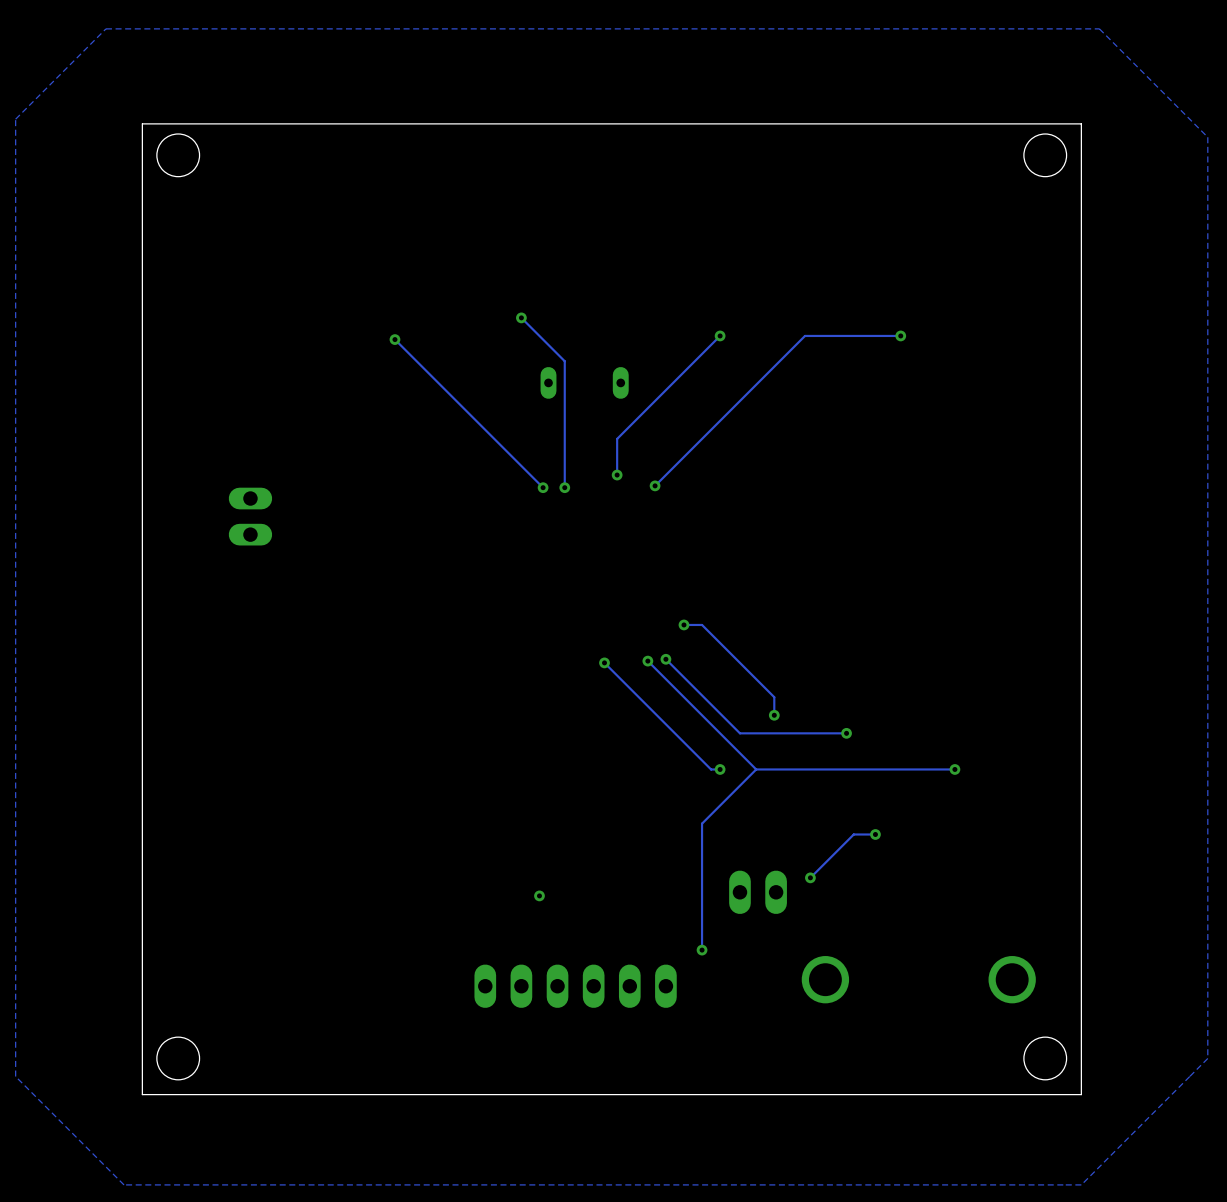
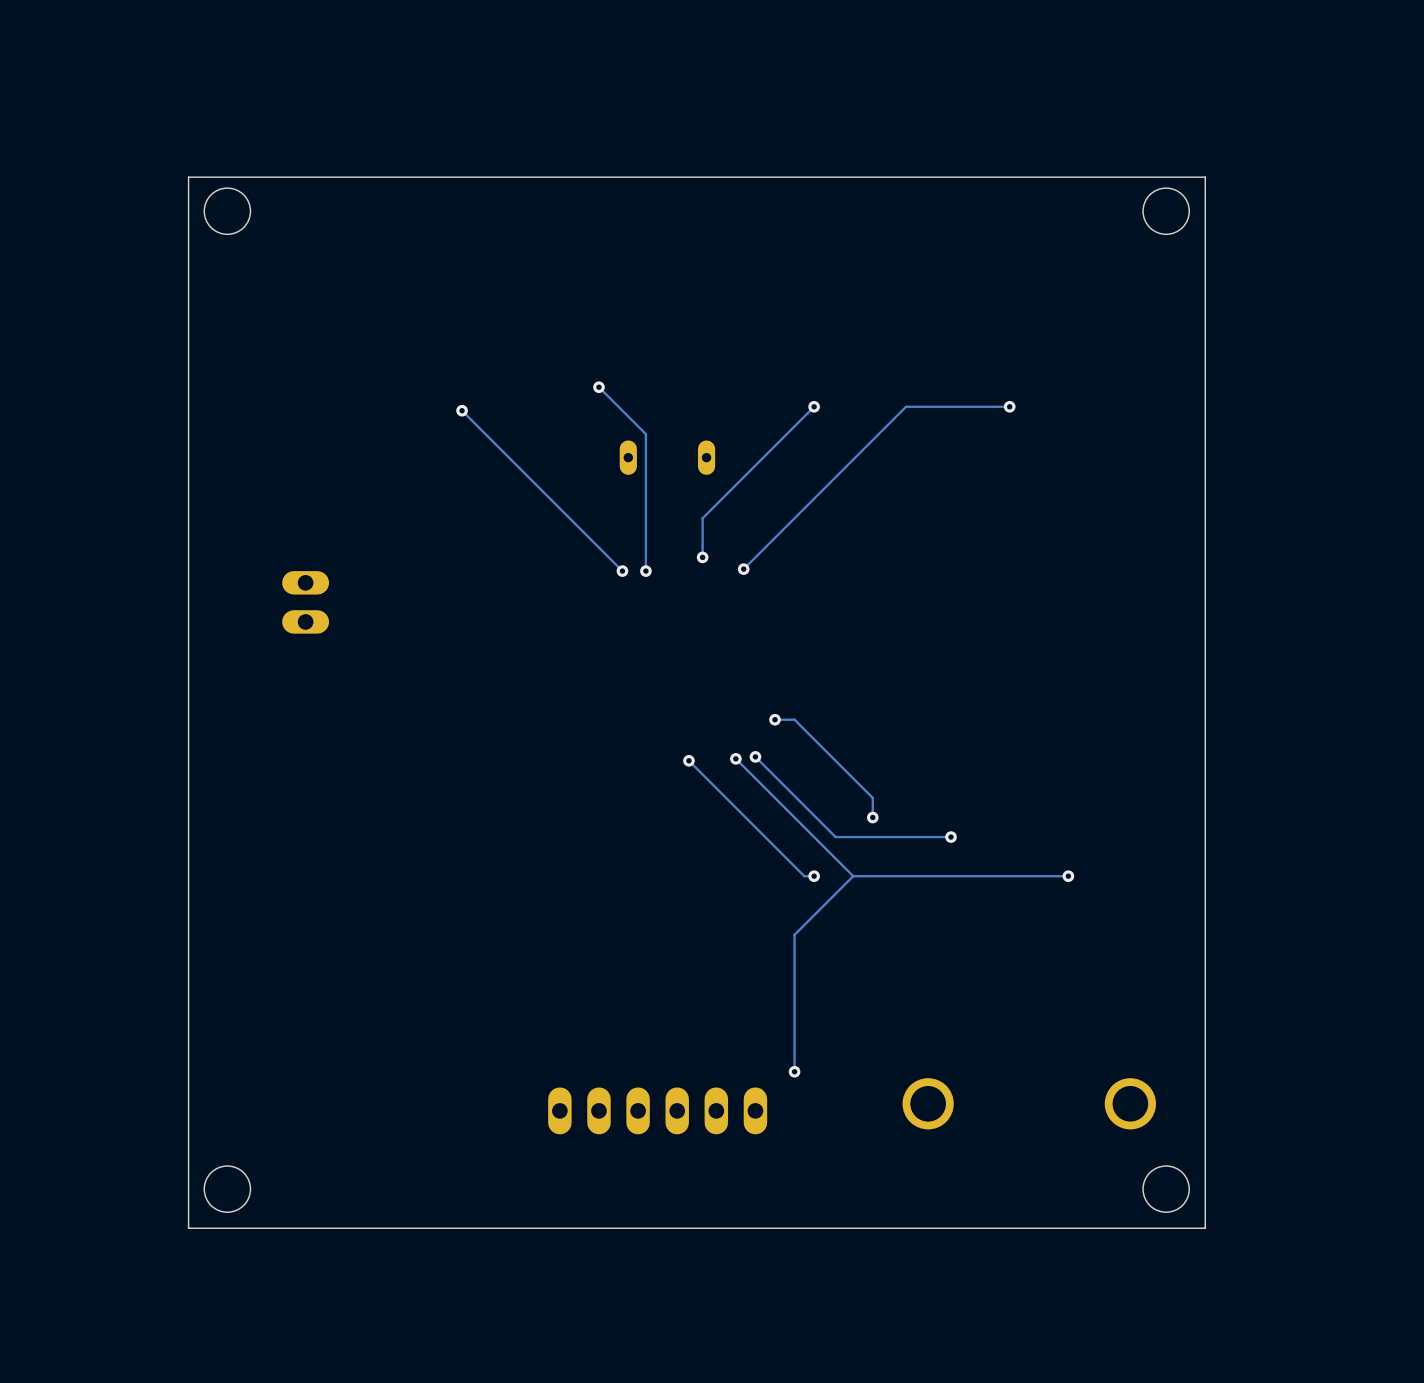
zone outline: (1099, 28) (105, 28) (15, 119) (15, 1076) (124, 1184) (1081, 1184) (1207, 1058) (1207, 137) (1099, 28) -> none
track: (875, 834) (853, 834) (810, 877) -> none
via: (875, 834) -> none
via: (810, 877) -> none
part: (758, 892) -> none
via: (539, 895) -> none

